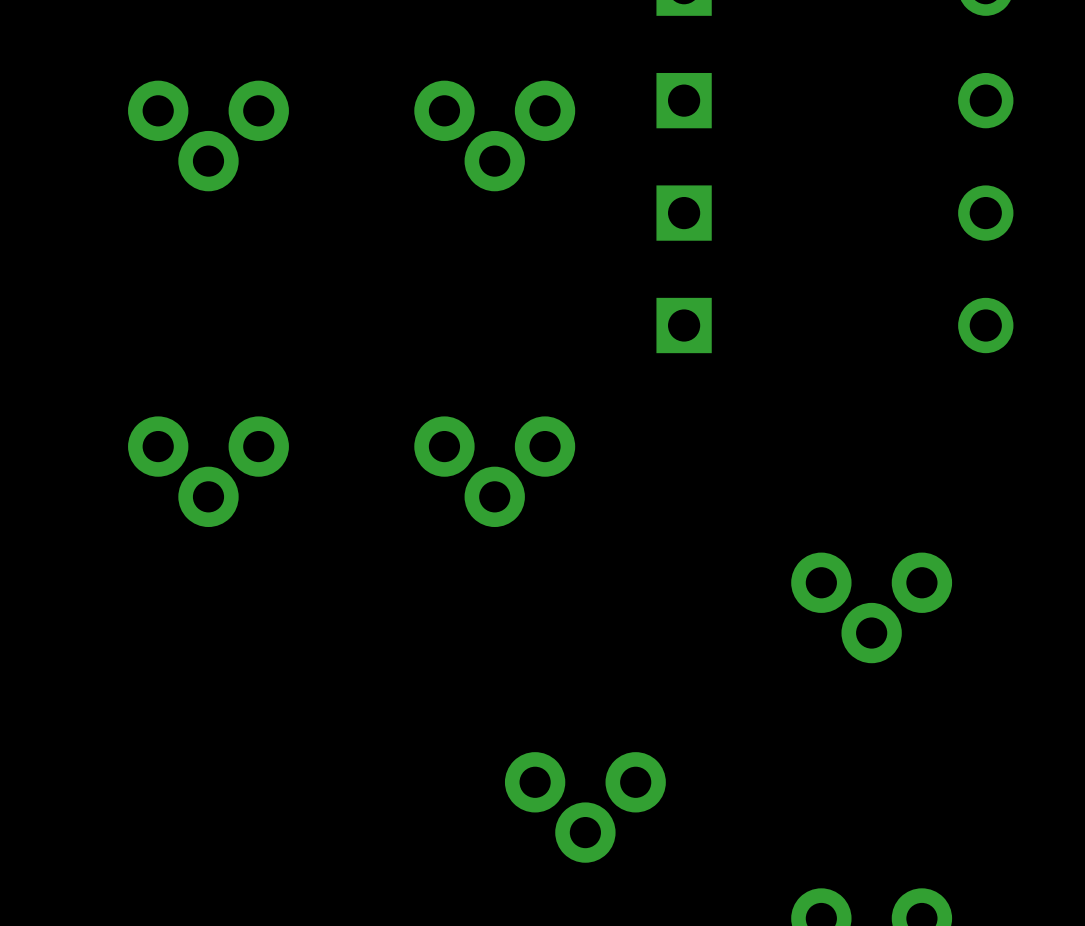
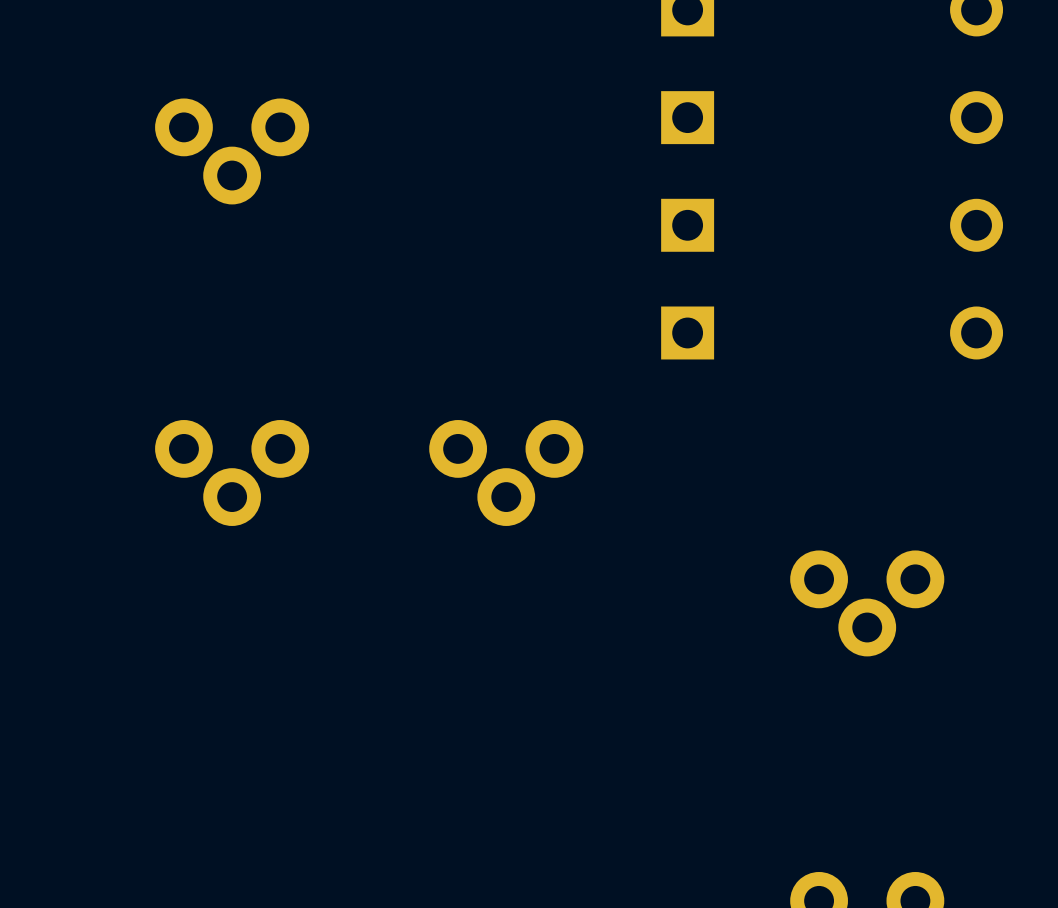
part: (494, 135) -> none
part: (585, 807) -> none

